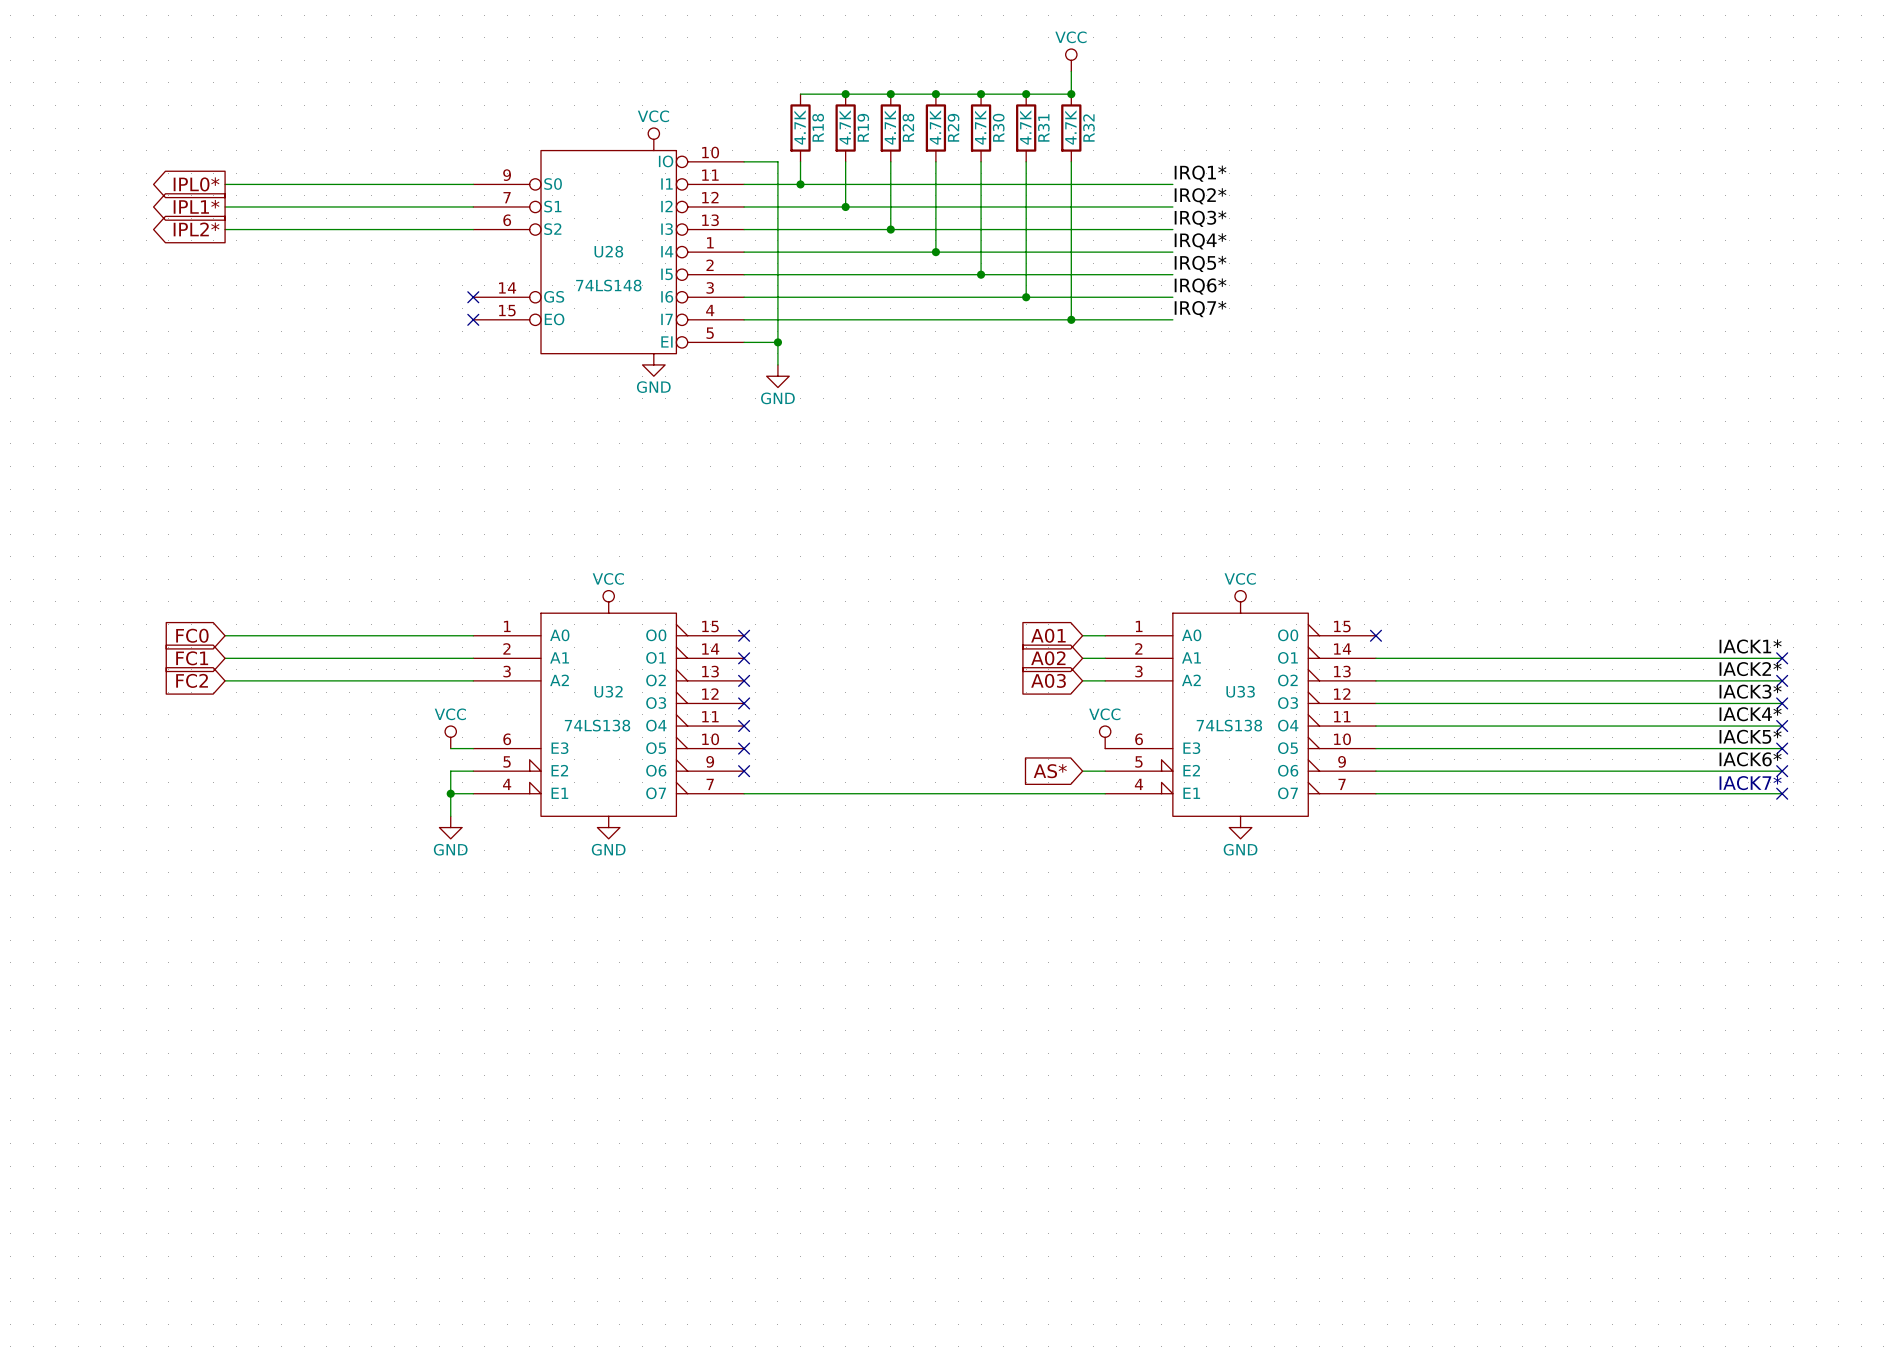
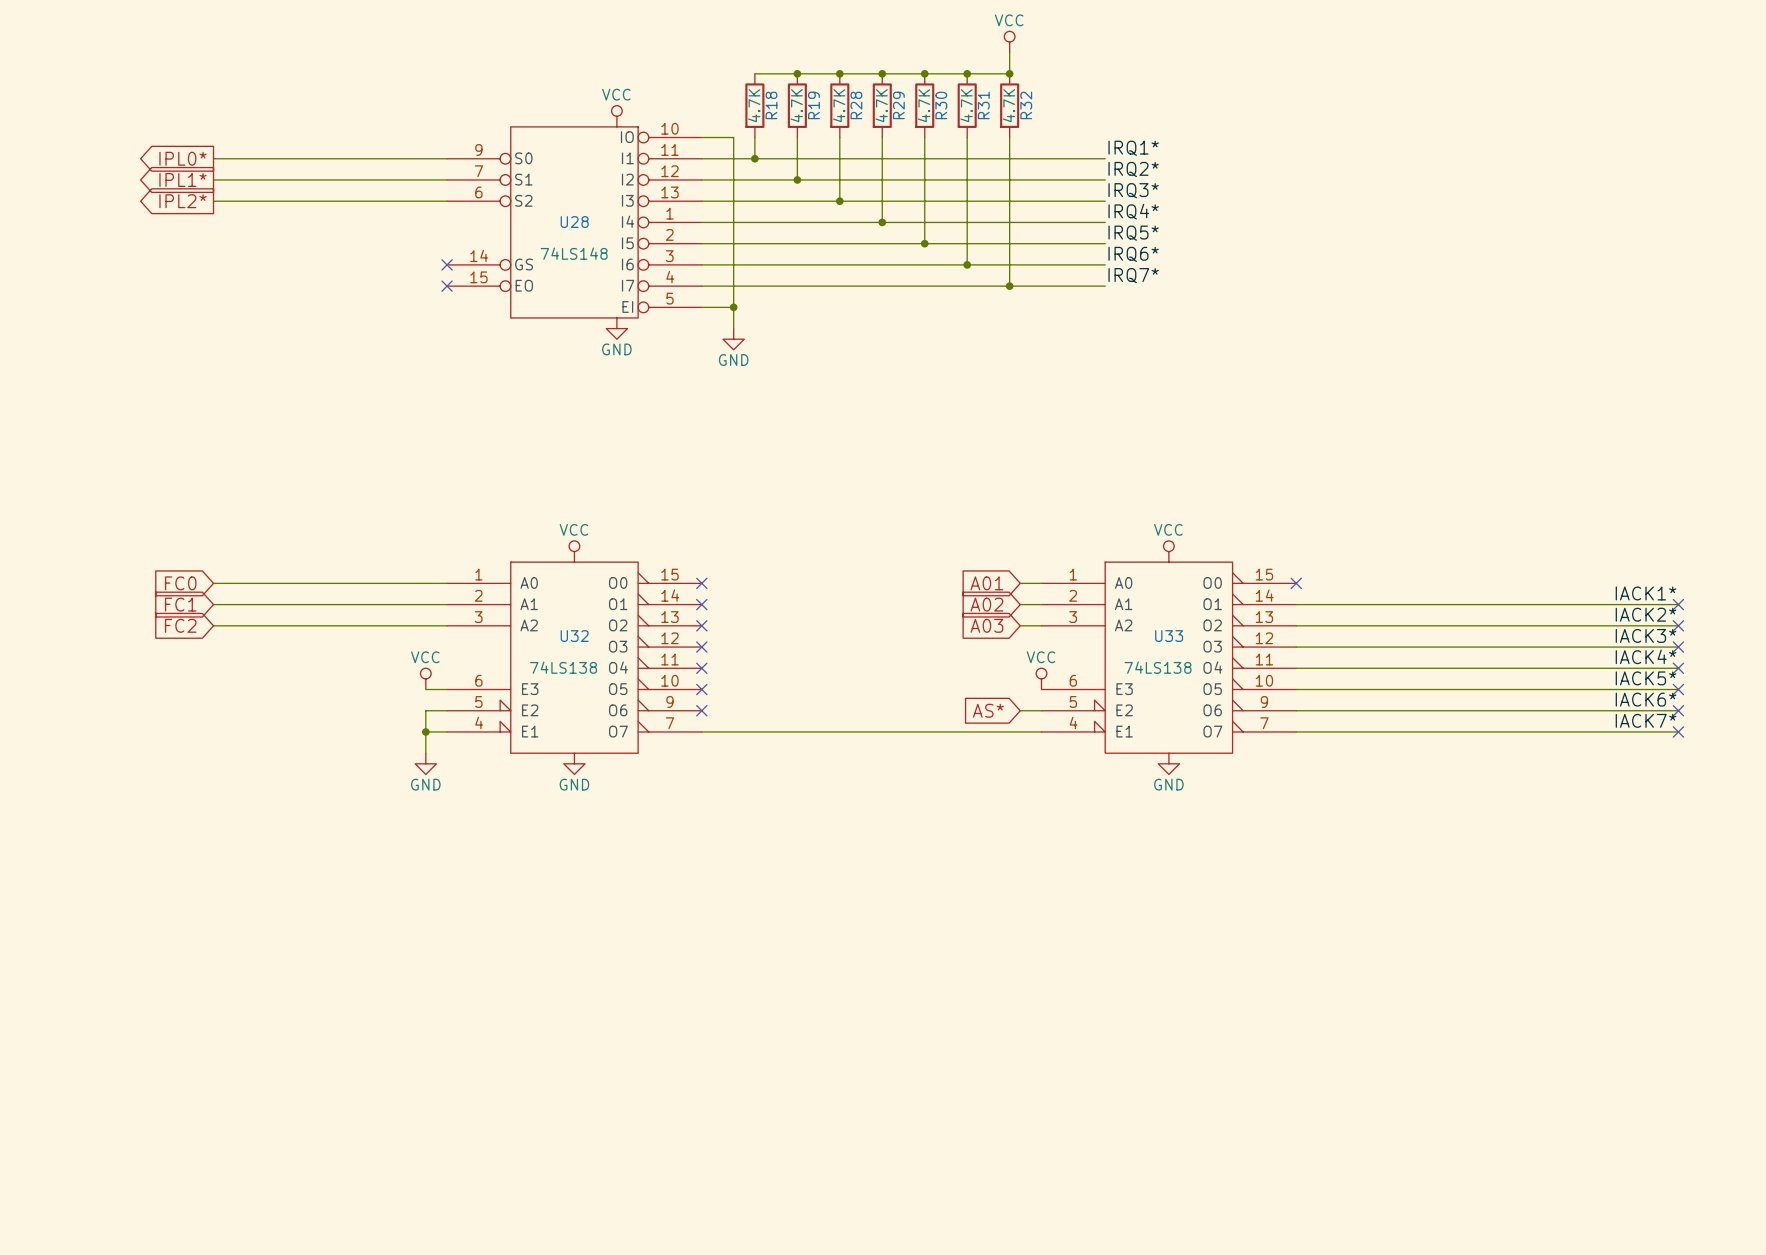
label: none -> IACK7* (1646, 720)
text: IACK7* (1750, 783) -> none

